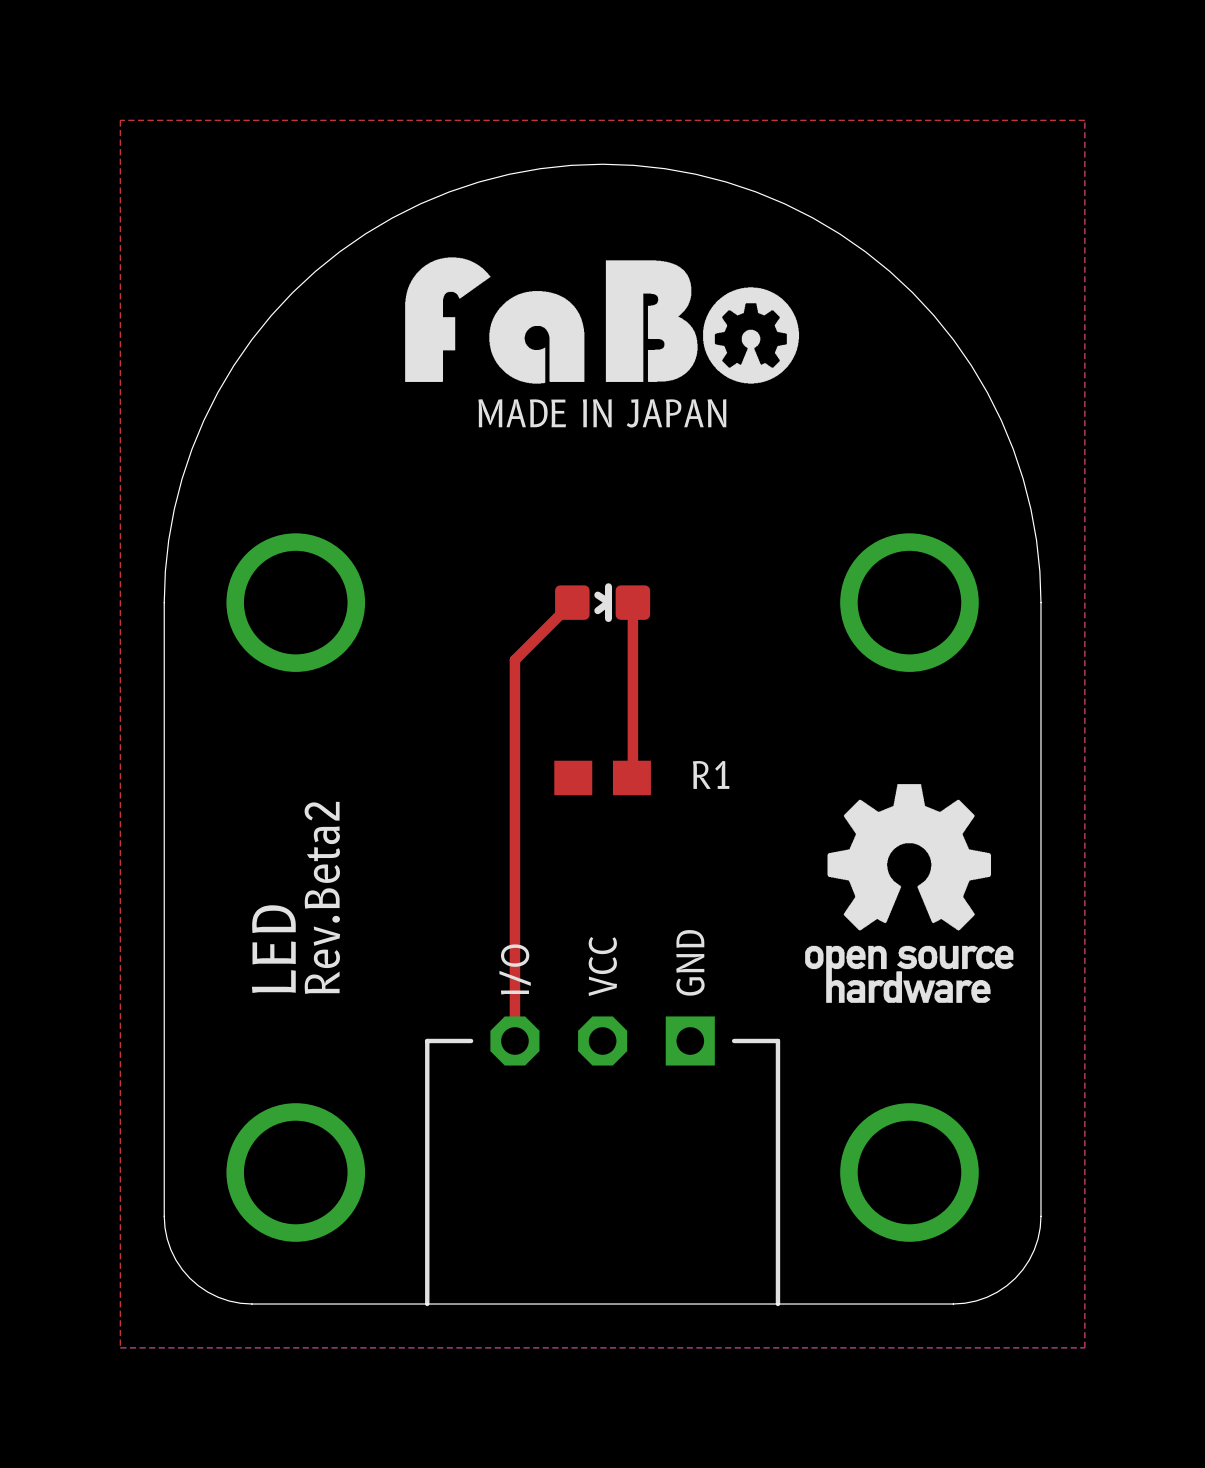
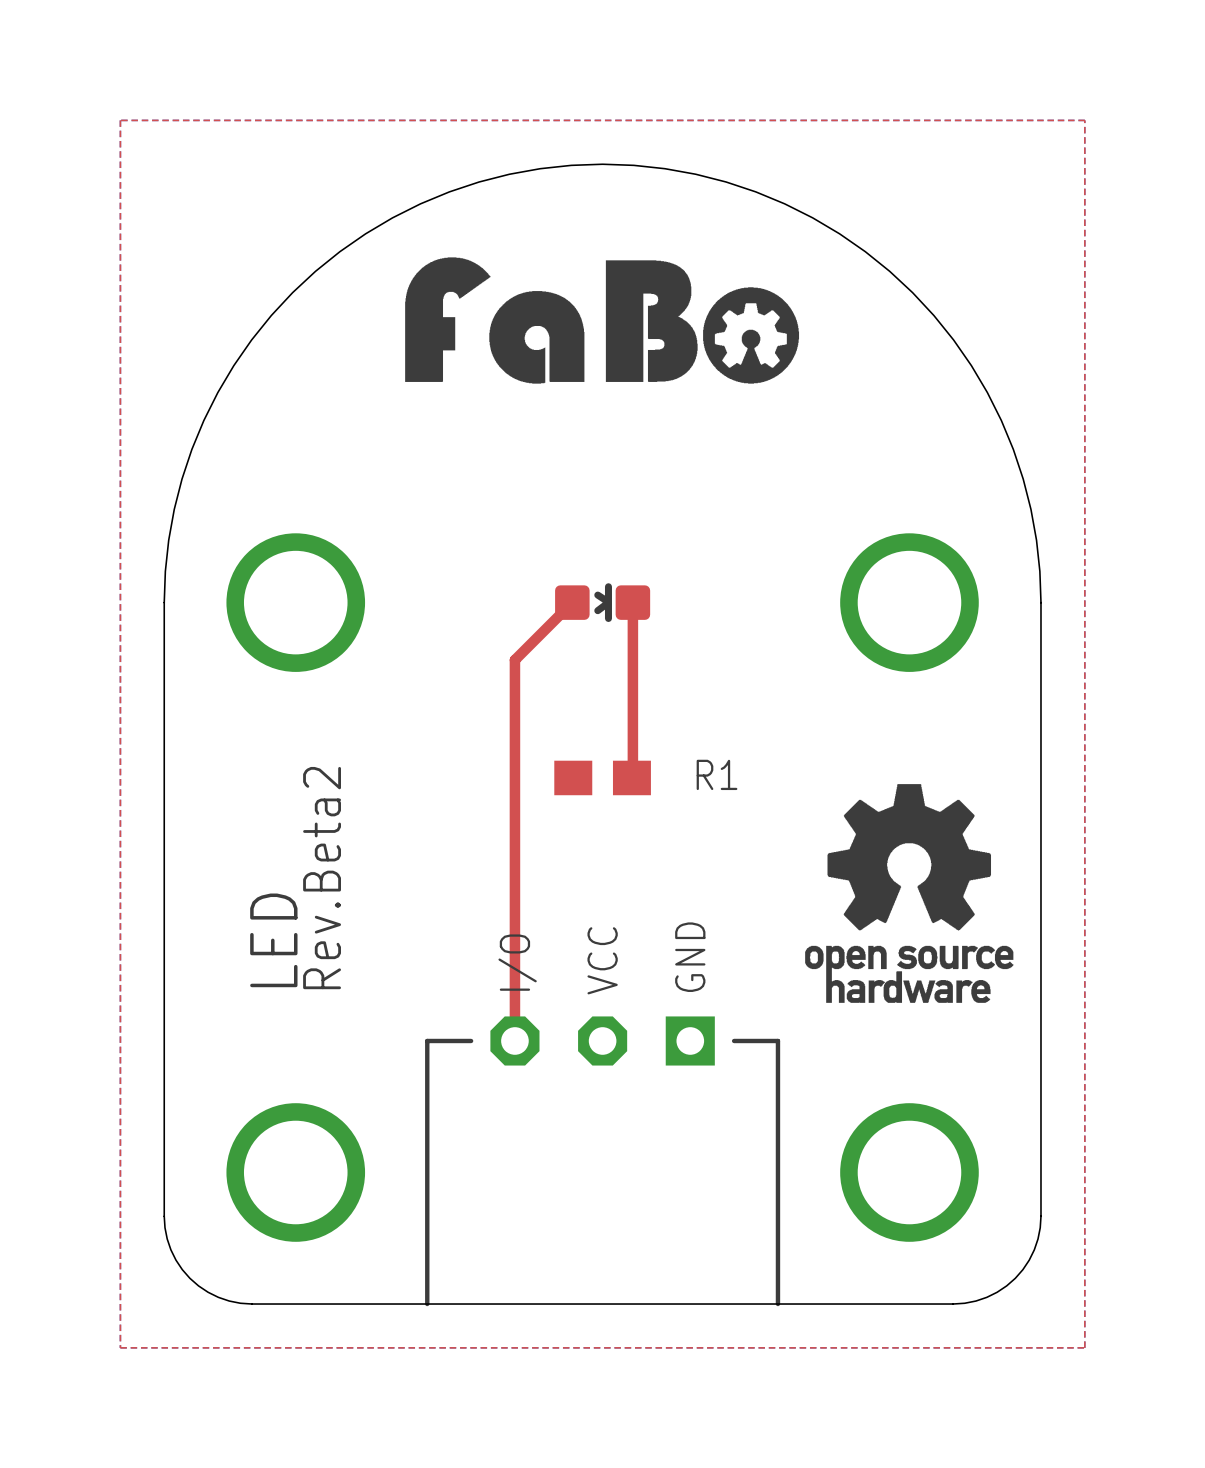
text: MADE IN JAPAN (602, 413) -> none

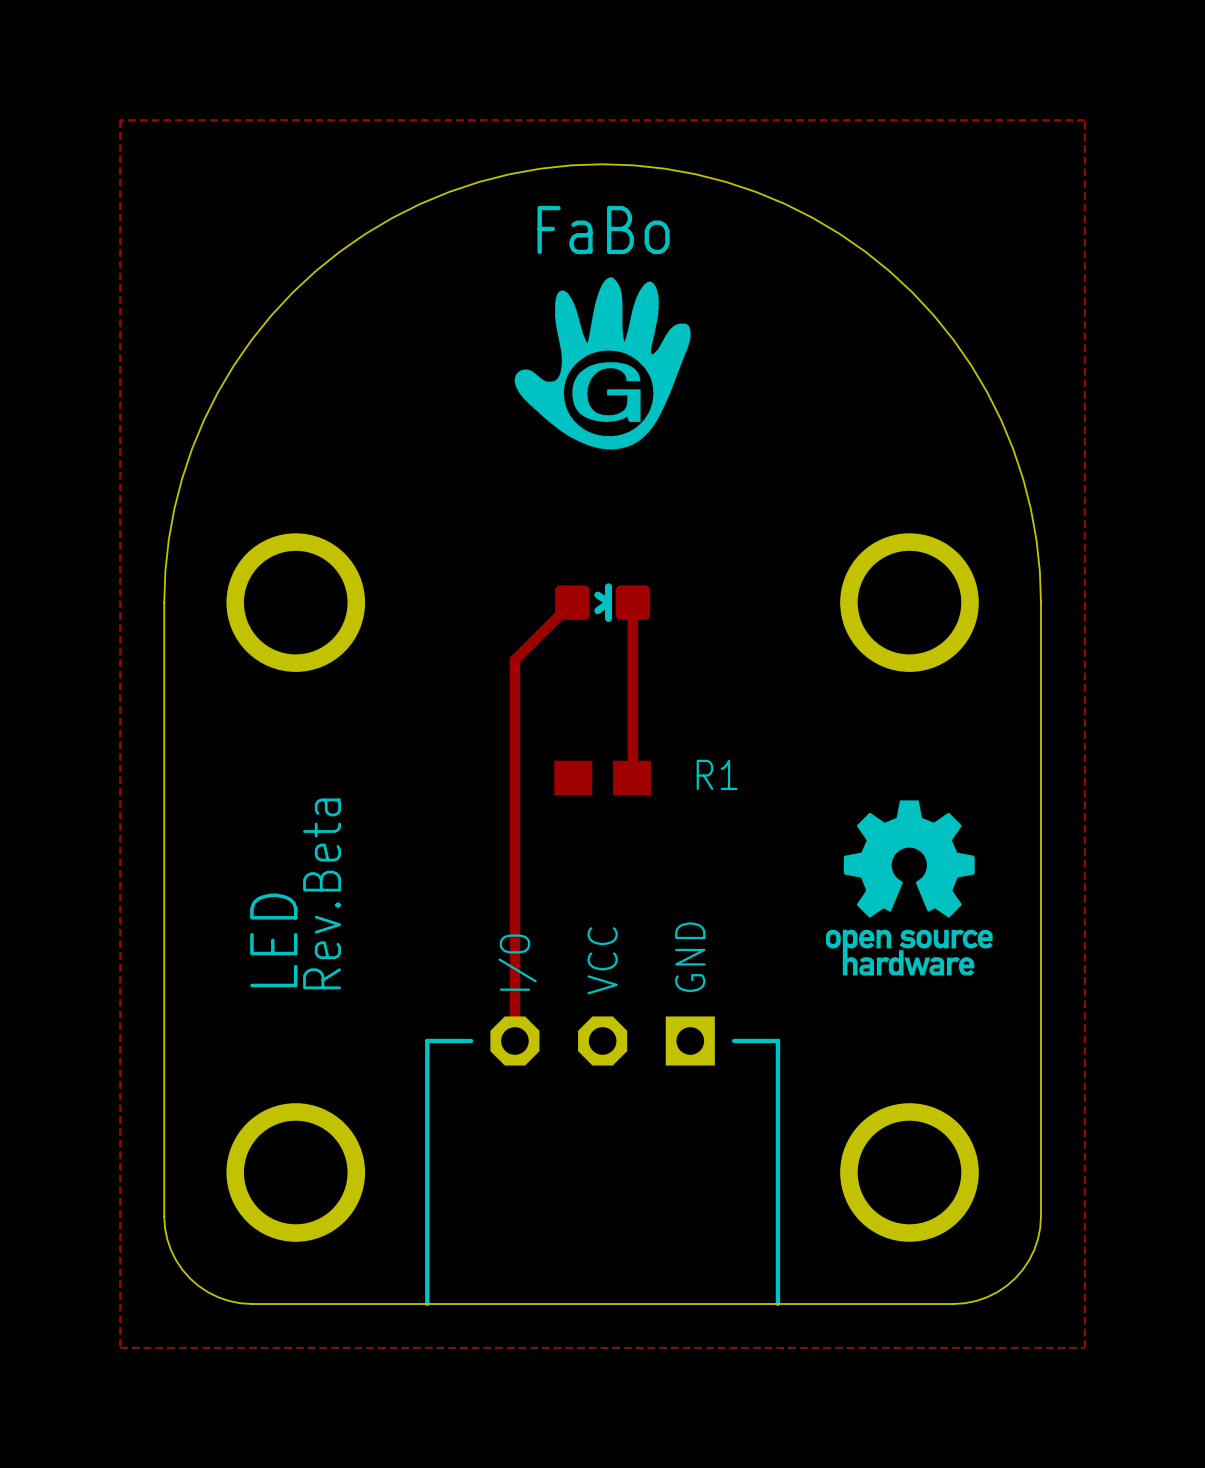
drawing: [405, 257, 800, 384] -> none
drawing: none -> [514, 277, 691, 450]
drawing shape: [805, 784, 1014, 1003] -> [826, 800, 993, 976]
text: Rev.Beta2 (322, 878) -> Rev.Beta (322, 893)

